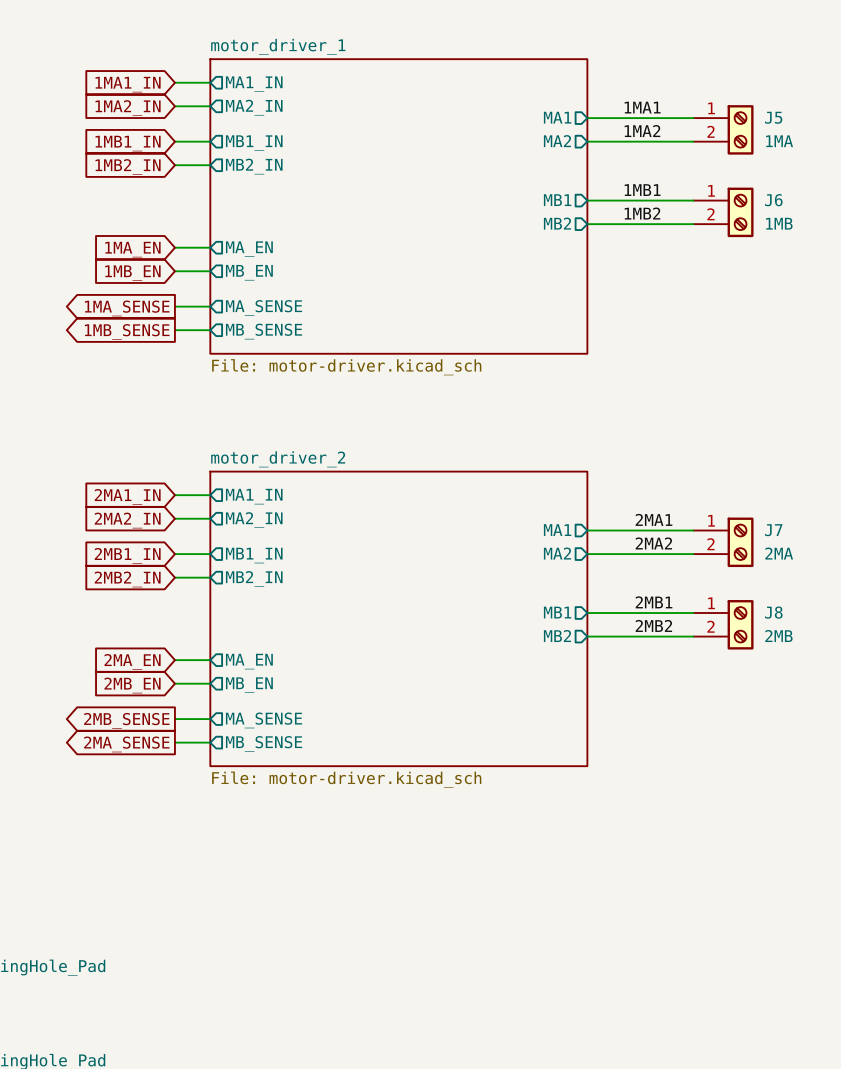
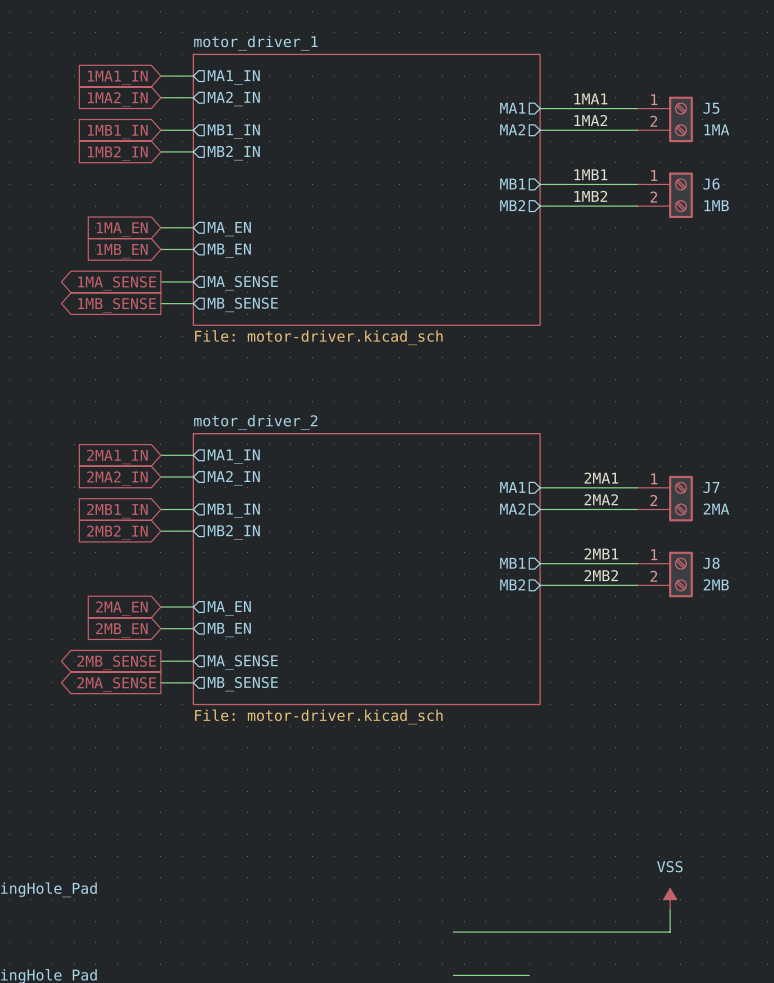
power symbol: none -> VSS (670, 899)
wire: none -> (670, 910) (670, 932) (453, 932)
wire: none -> (453, 975) (529, 975)

